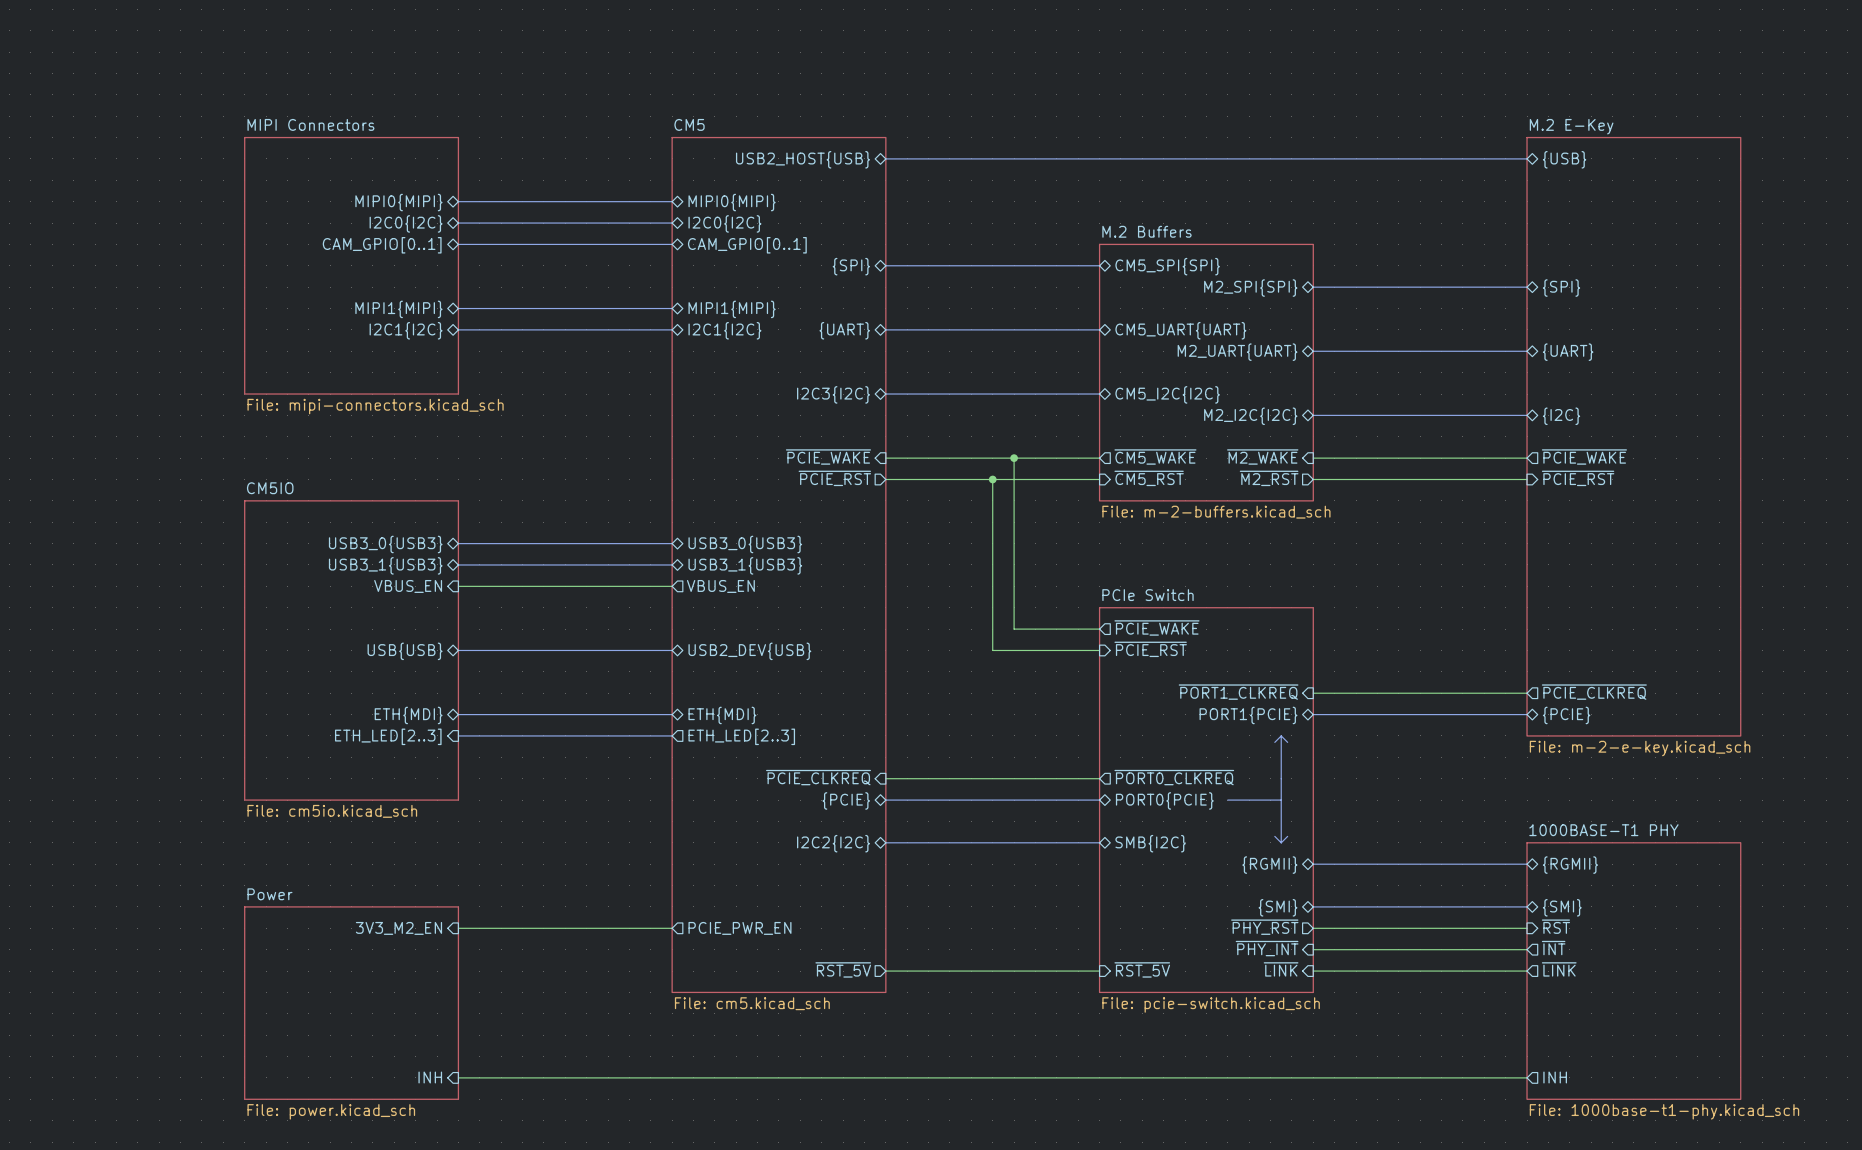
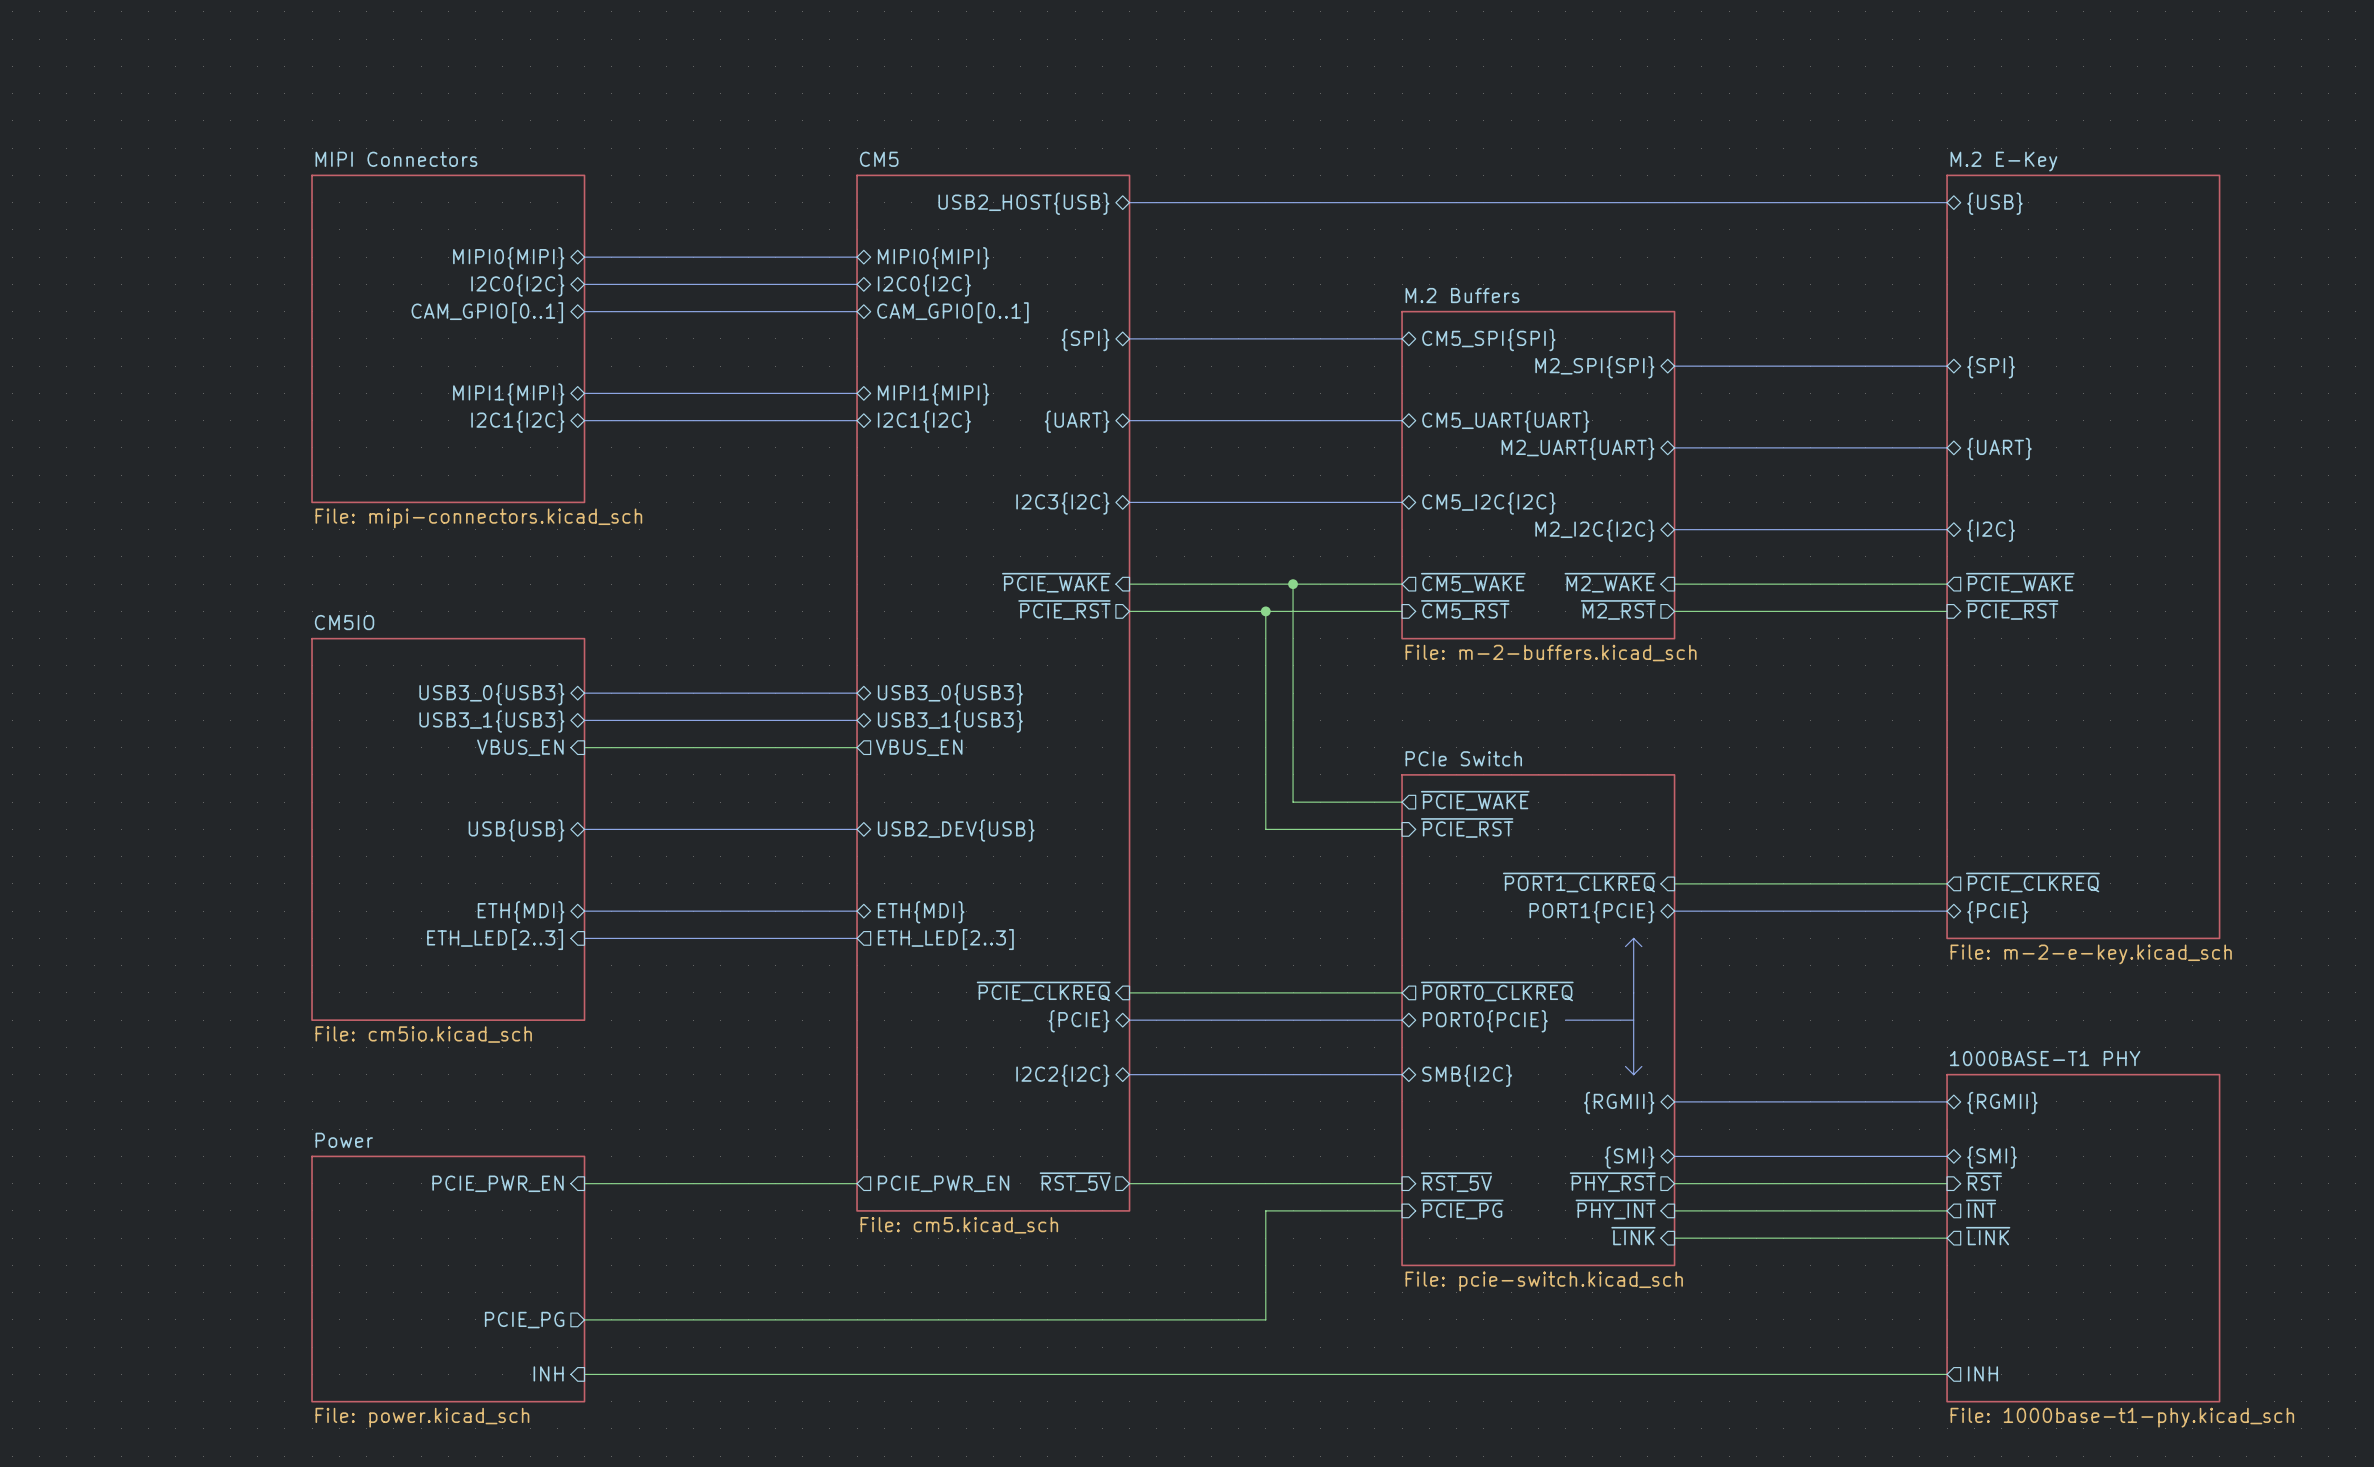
sheet CM5 shape: [671, 136, 887, 994] -> [856, 174, 1131, 1212]
sheet pin: 3V3_M2_EN (398, 928) -> PCIE_PWR_EN (498, 1183)
sheet pin: none -> ~{PCIE_PG} (1462, 1209)
wire: none -> (1402, 1210) (1265, 1210) (1265, 1319) (584, 1319)
sheet pin position: ~{RST_5V} (843, 969) -> ~{RST_5V} (1075, 1182)
sheet pin position: ~{RST_5V} (1142, 969) -> ~{RST_5V} (1456, 1182)
wire: (885, 971) (1099, 971) -> (1129, 1183) (1402, 1183)
sheet CM5 value position: File: cm5.kicad_sch (752, 1003) -> File: cm5.kicad_sch (959, 1225)
sheet pin: none -> PCIE_PG (524, 1320)

